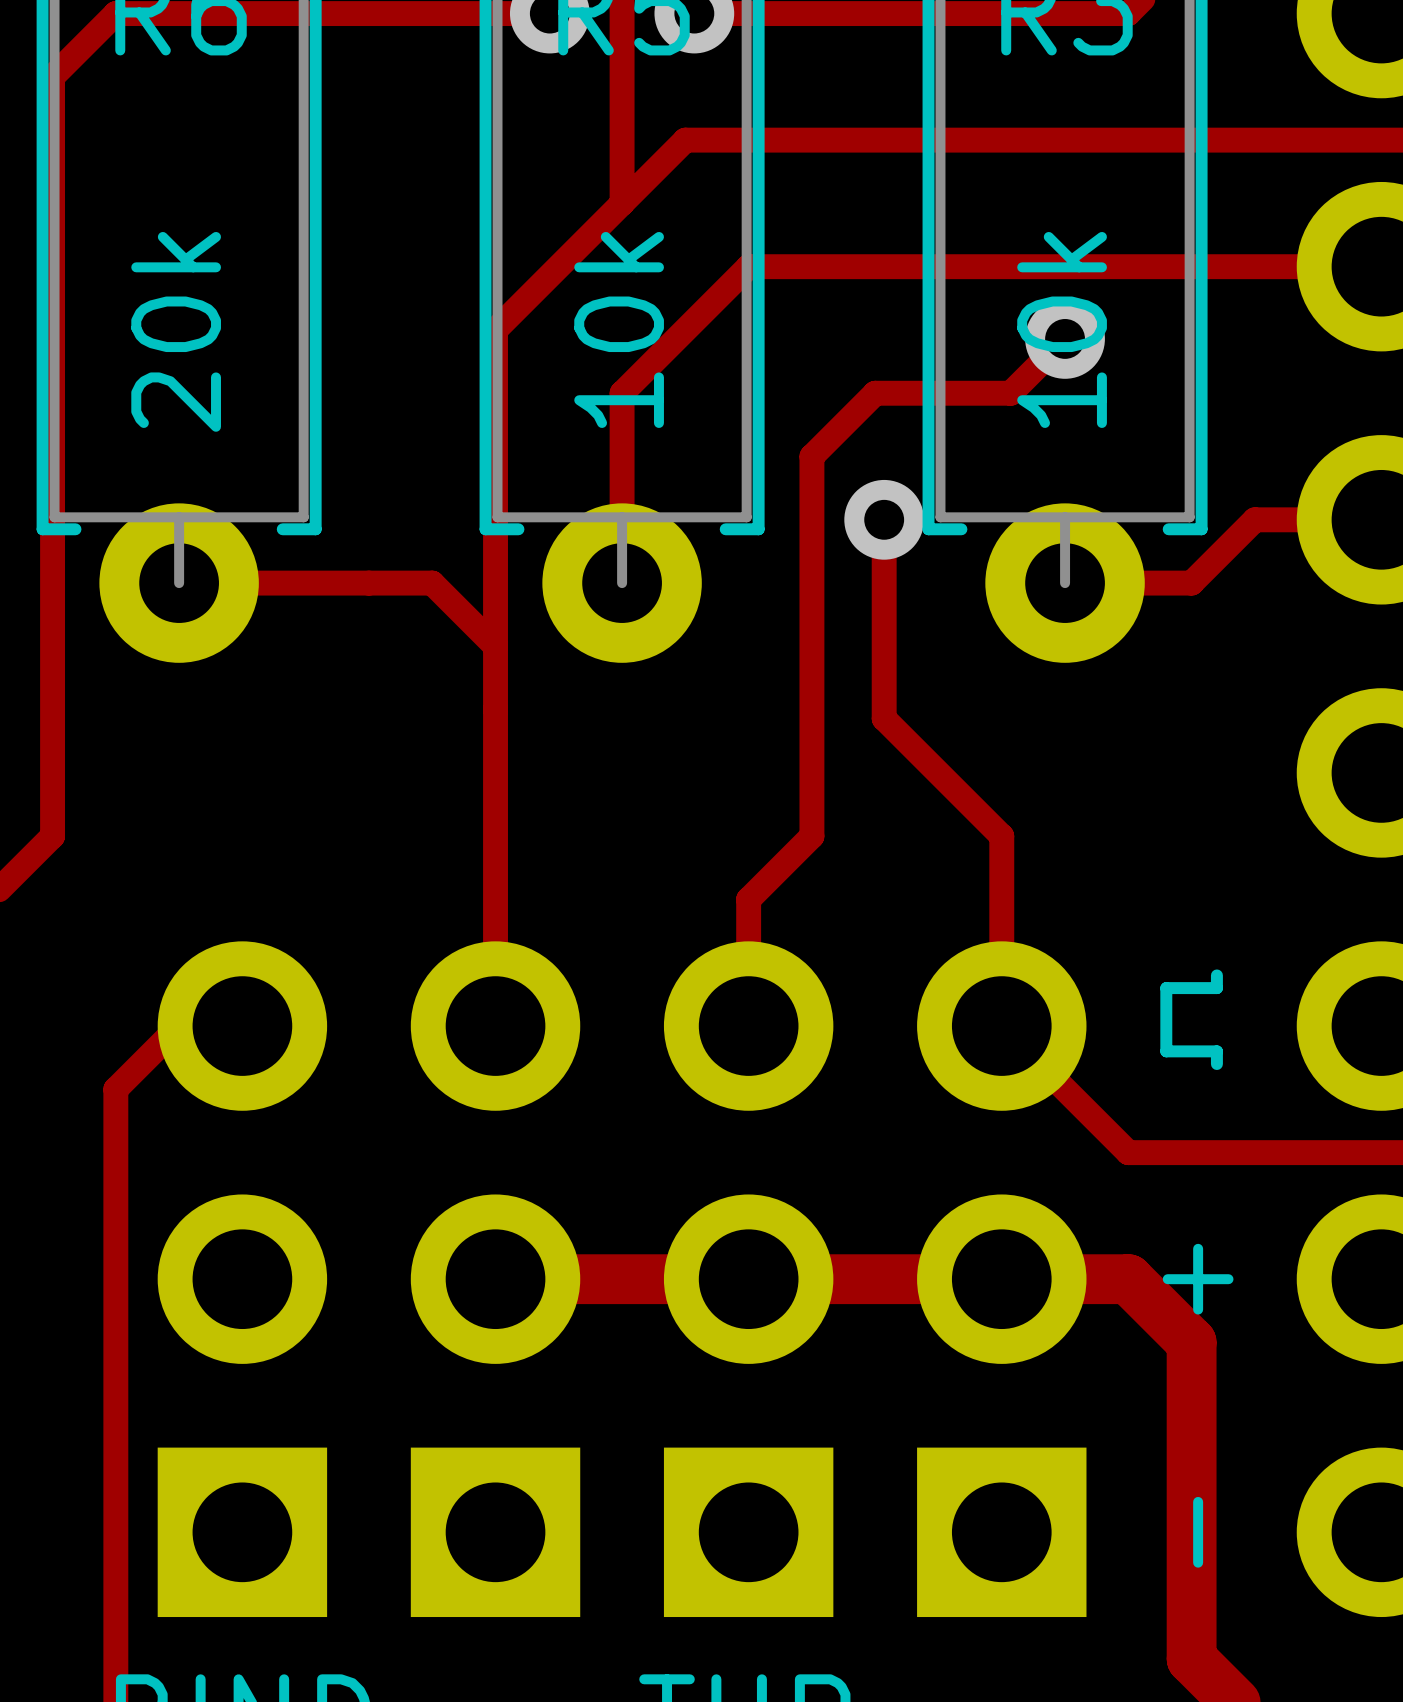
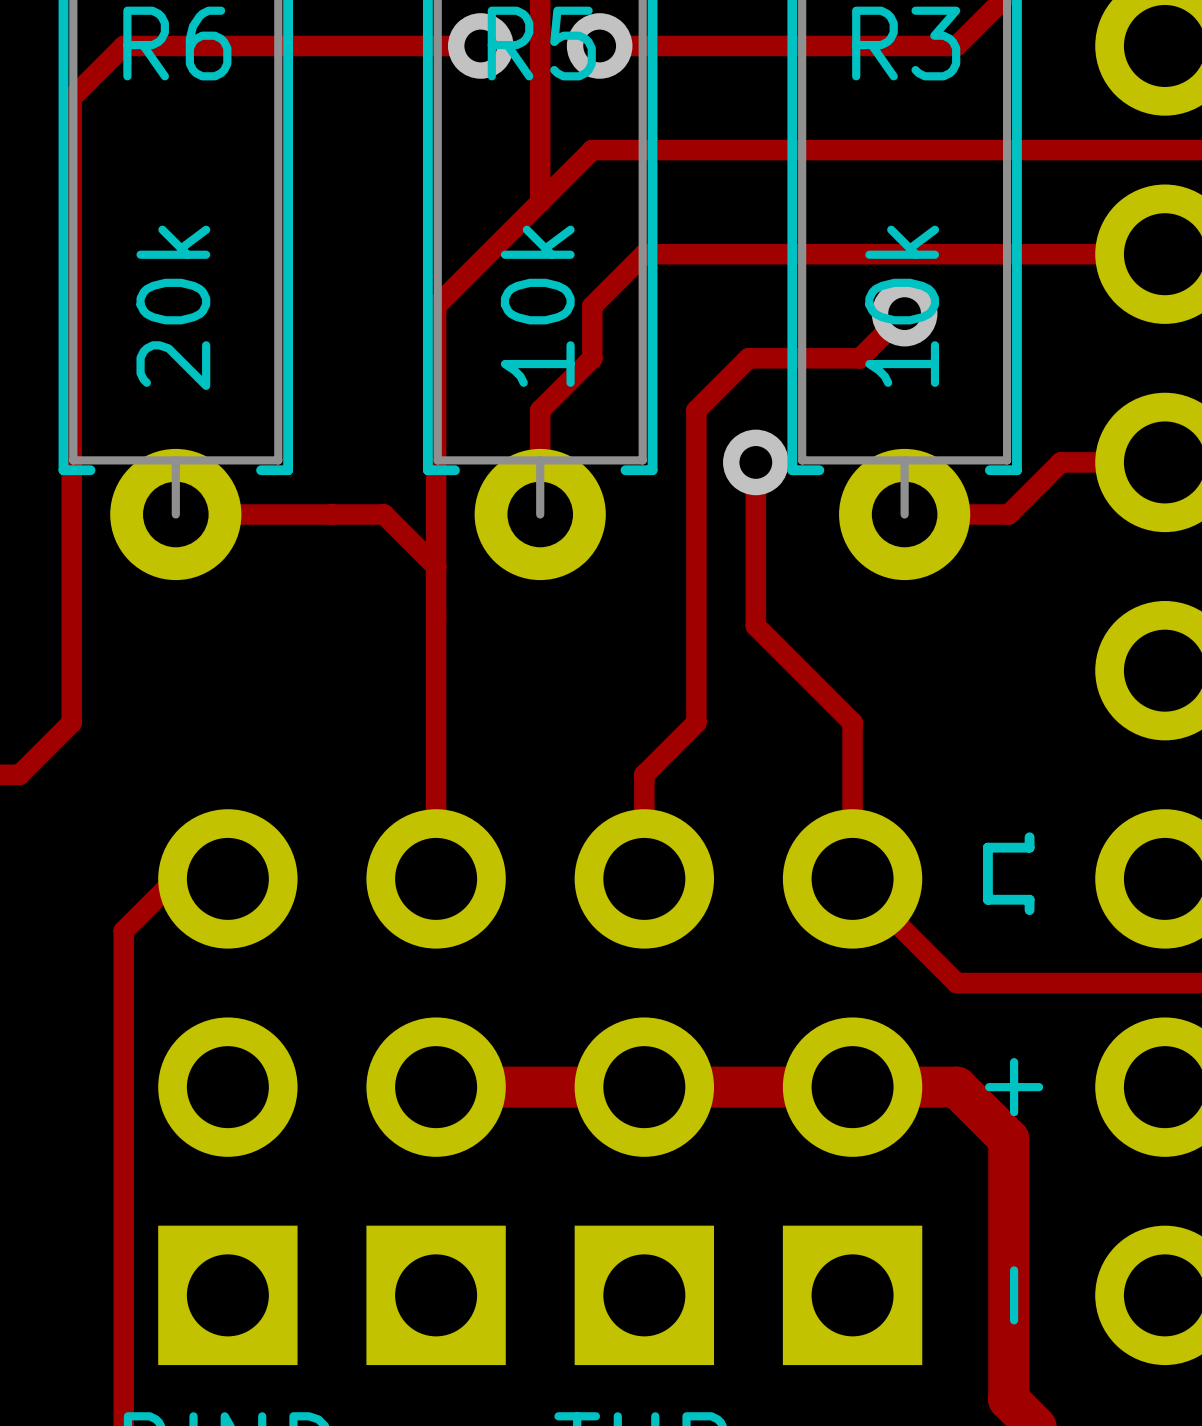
track: (685, 329) (622, 393) (622, 456) -> (592, 306) (592, 358) (540, 410)

